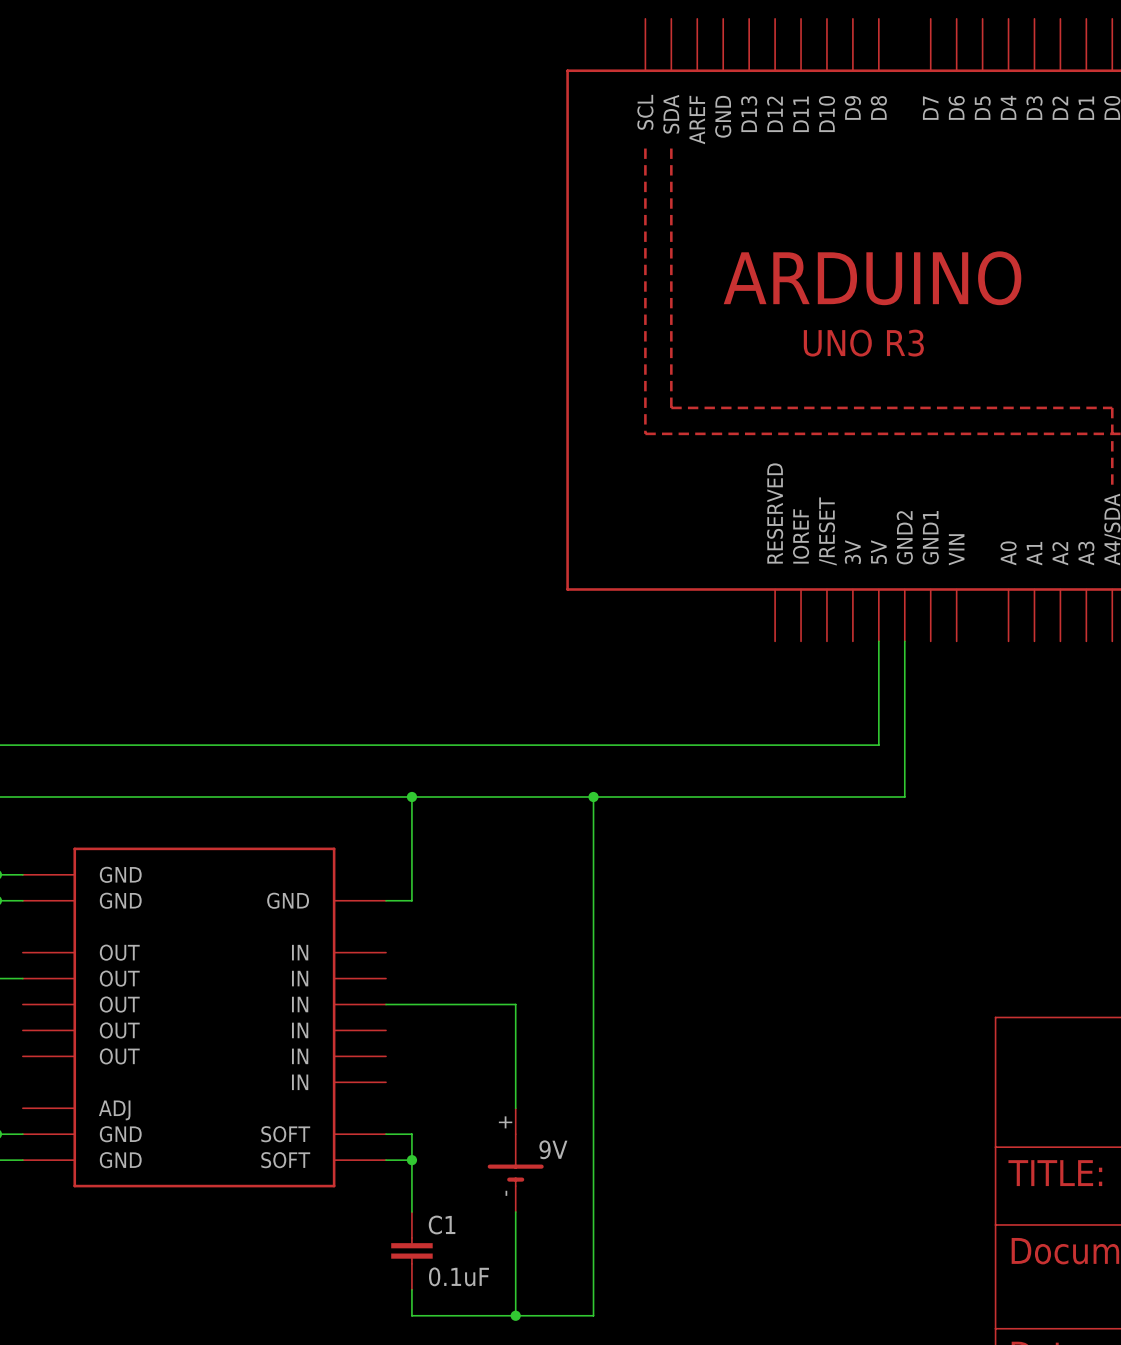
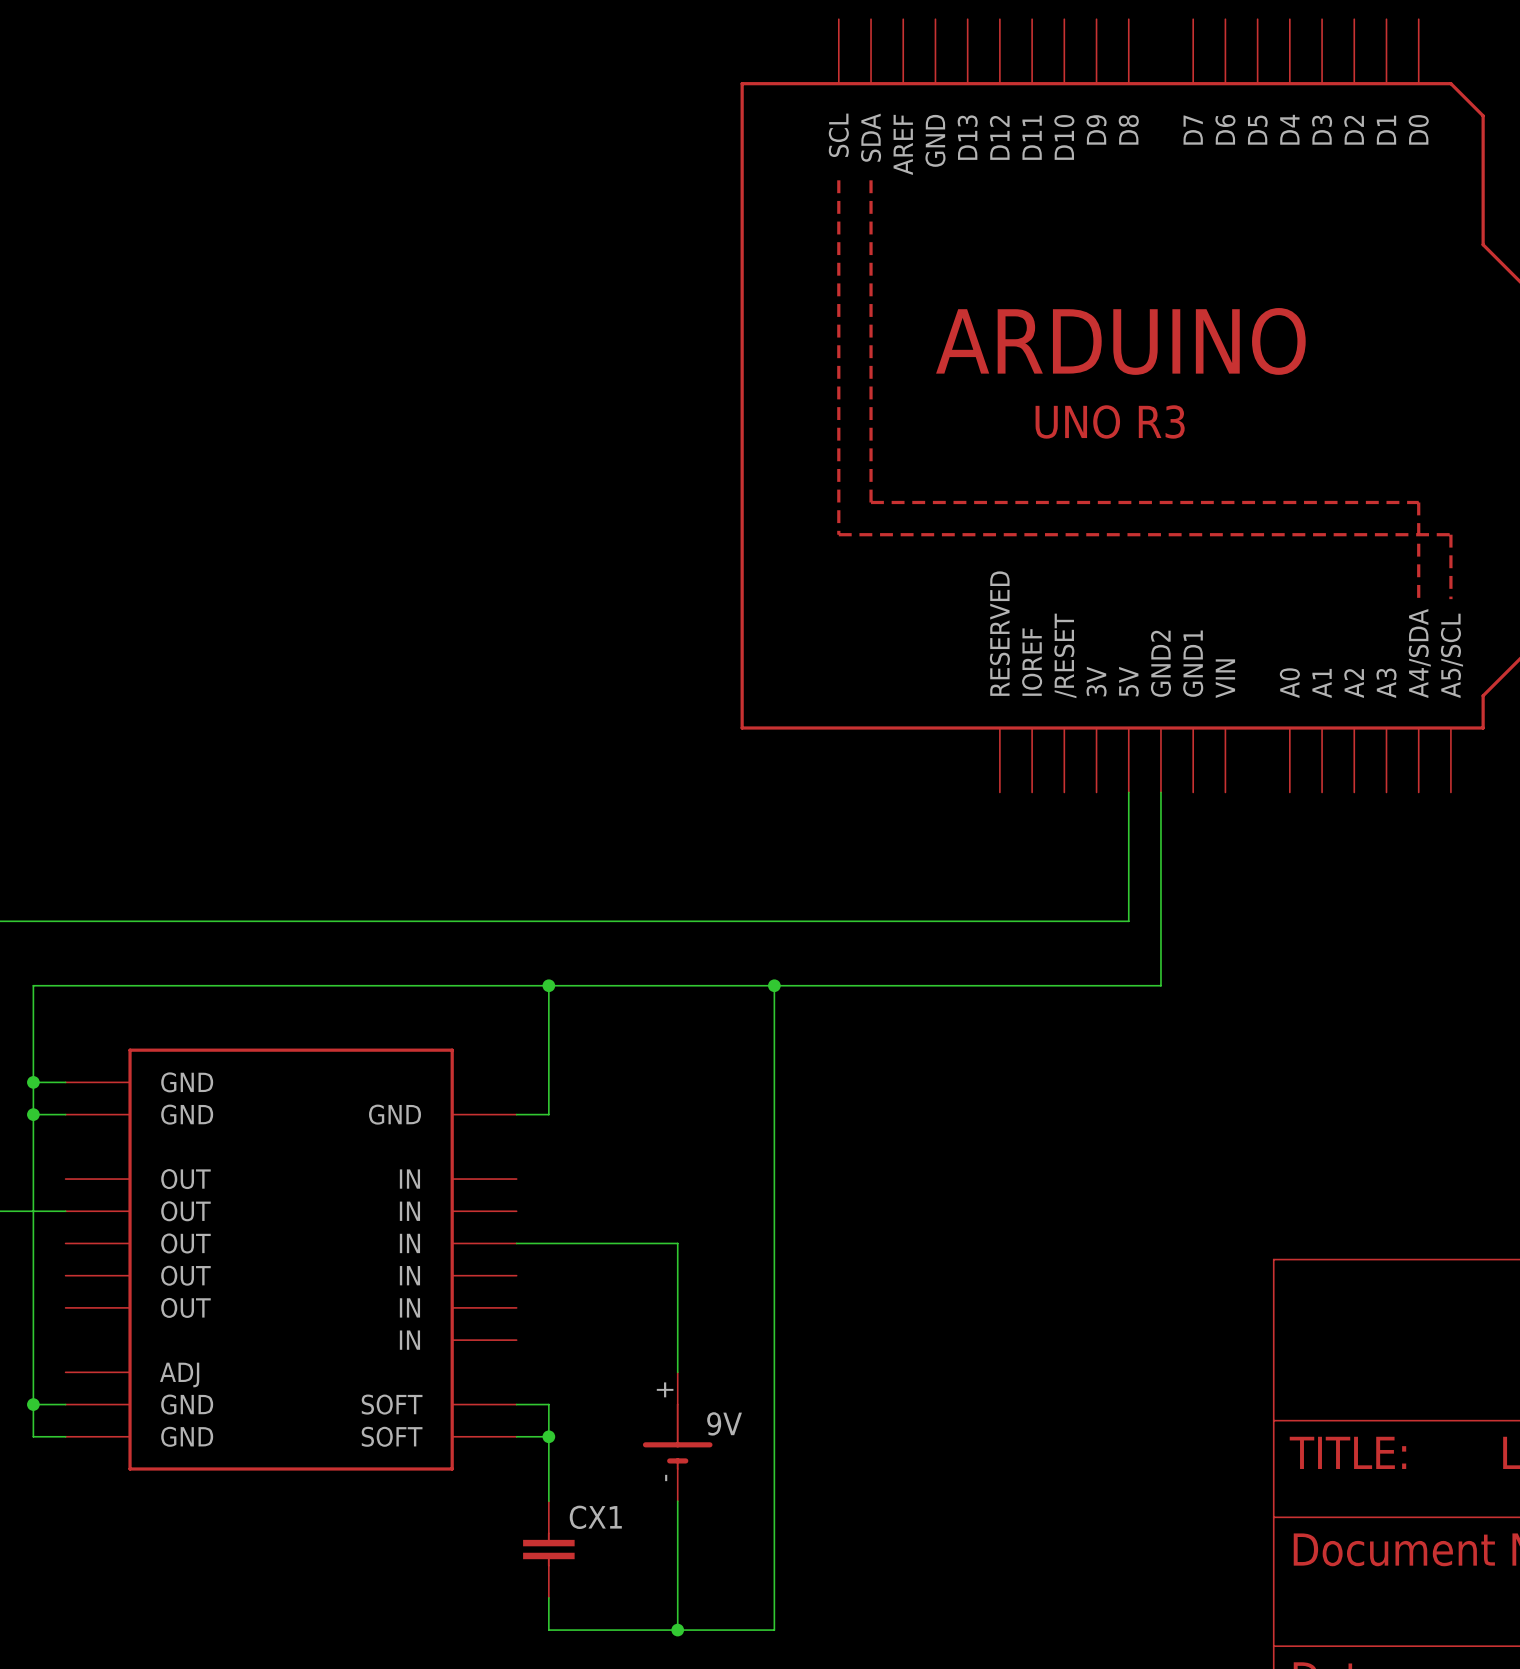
C1 name: C1 (442, 1225) -> CX1 (595, 1517)
C1 value: 0.1uF (458, 1276) -> none

